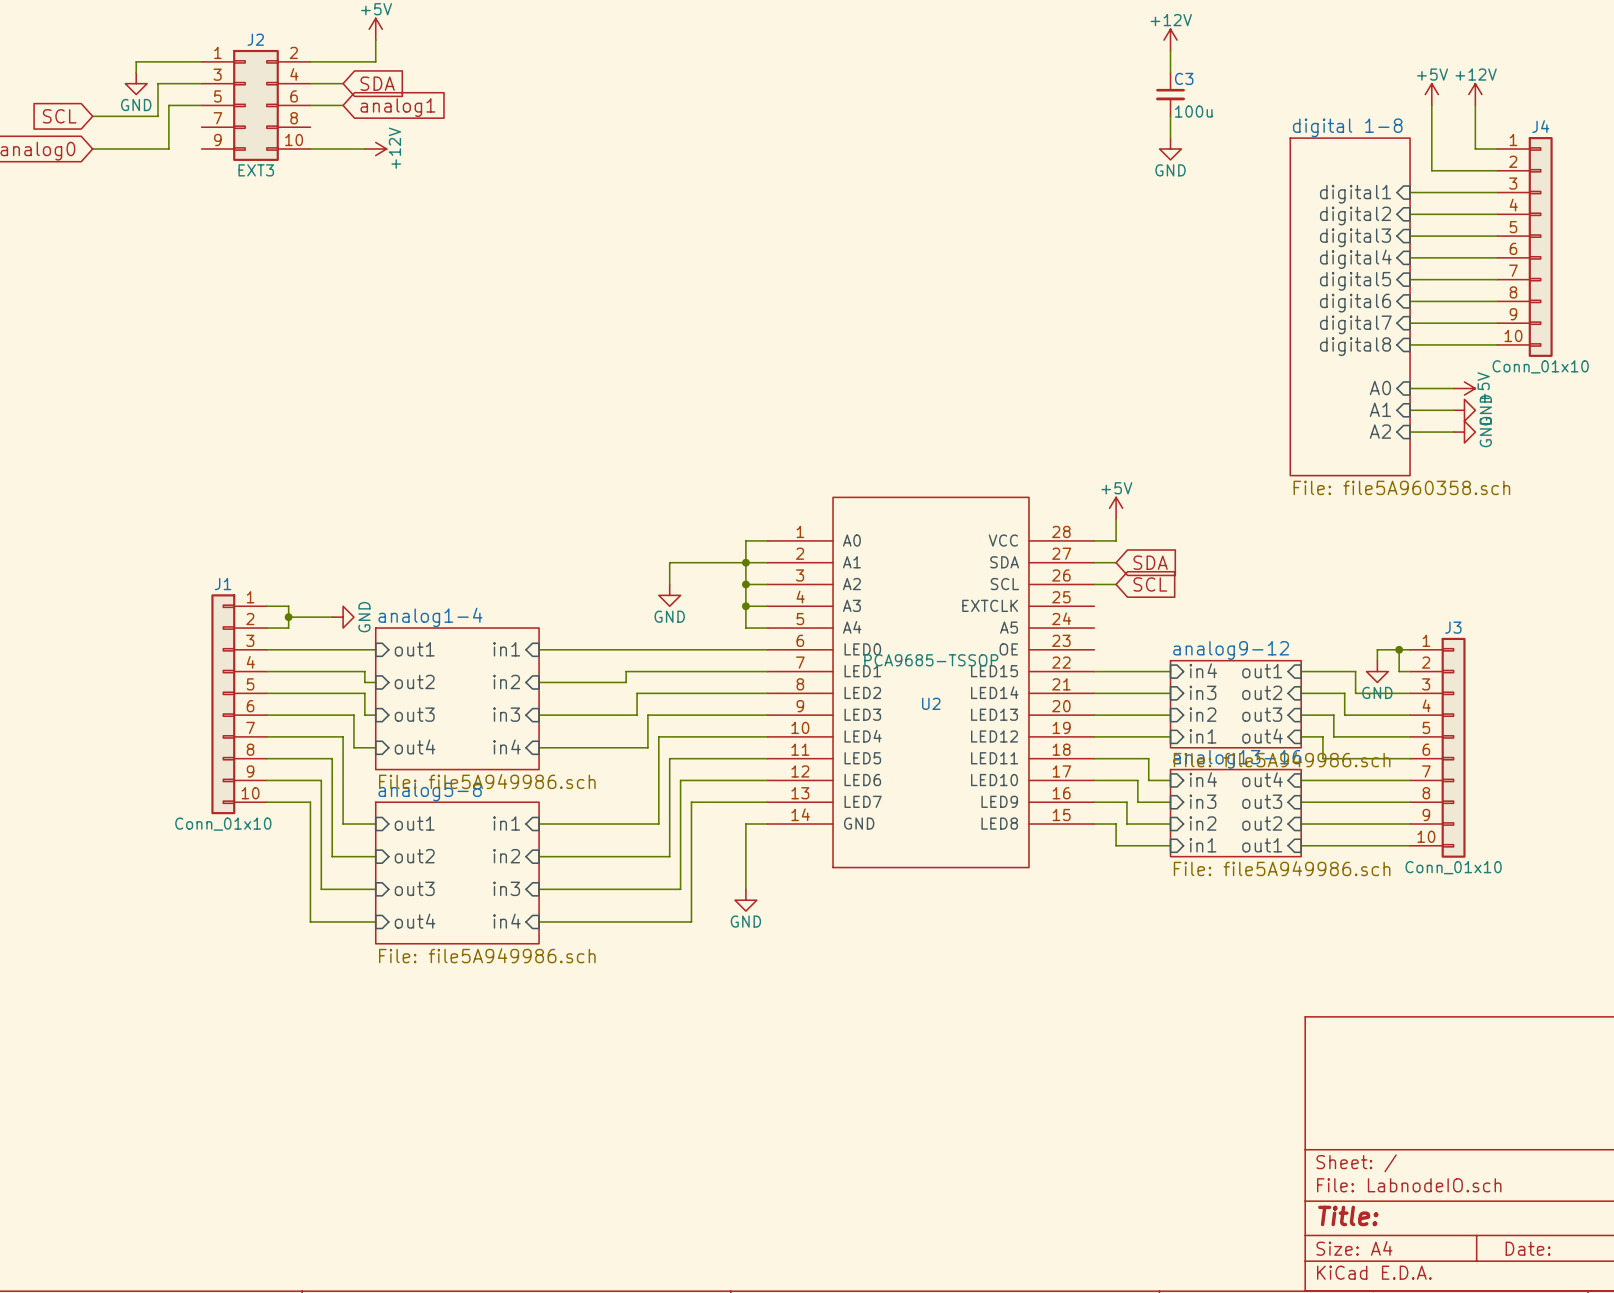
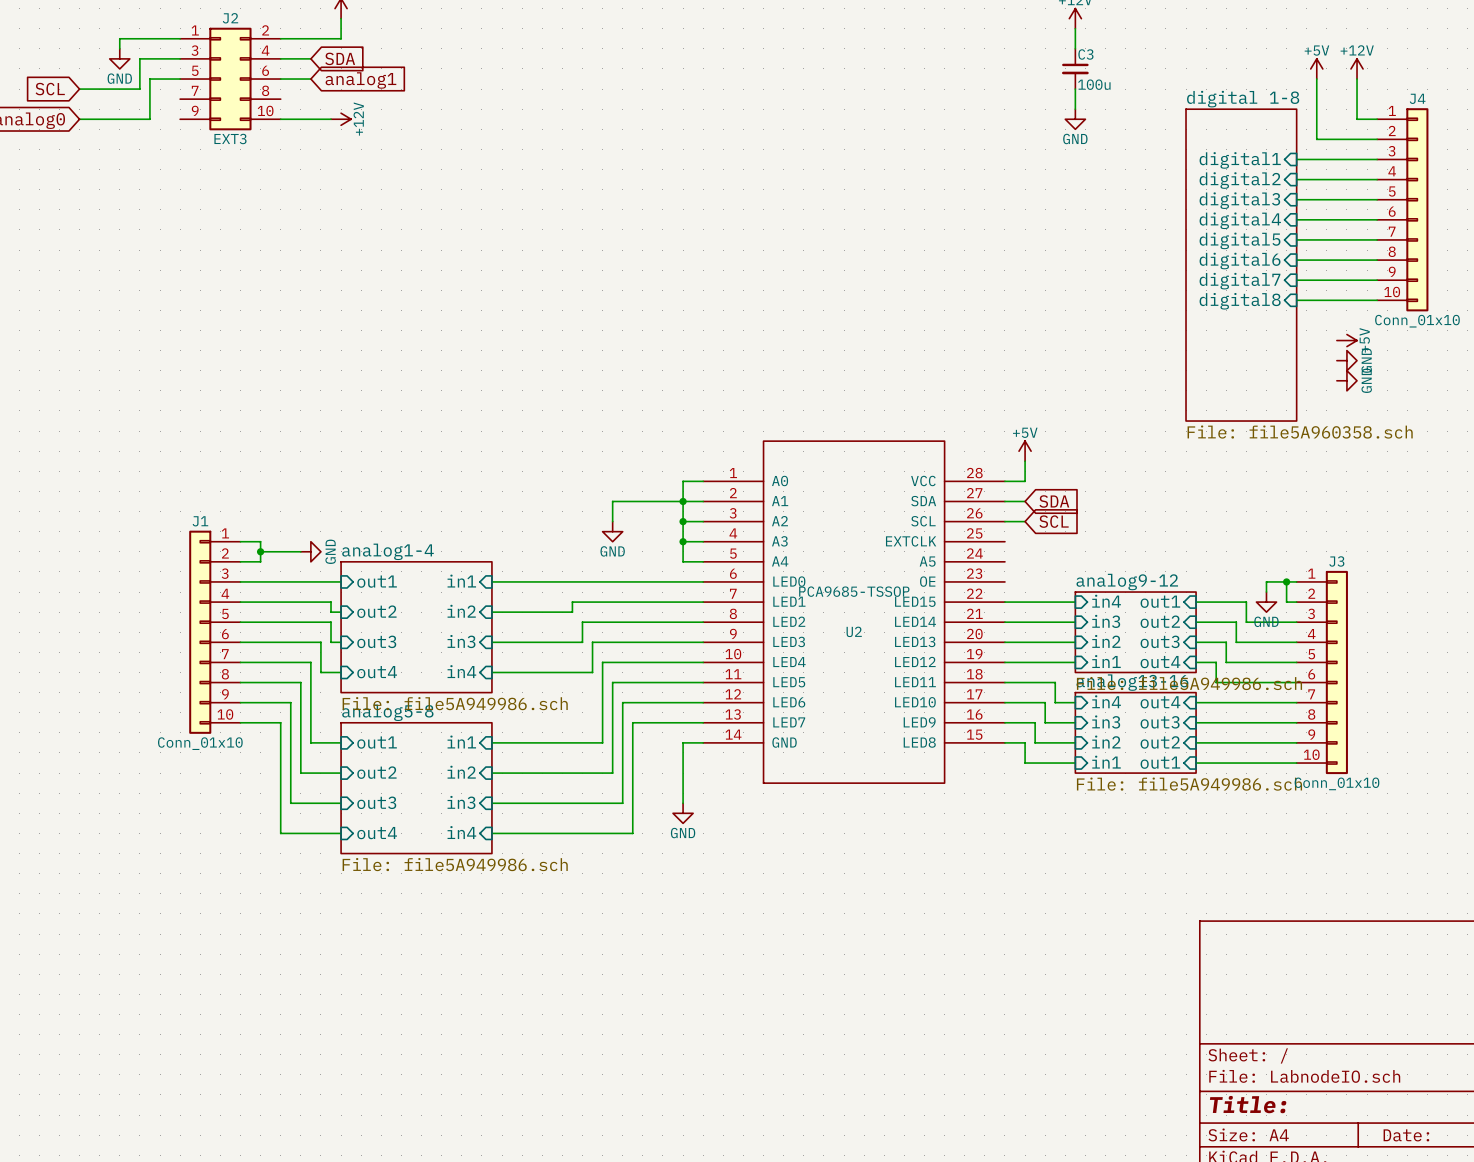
sheet pin: A0 (1380, 388) -> none
wire: (1410, 388) (1453, 388) -> none
sheet pin: A1 (1380, 409) -> none
wire: (1410, 410) (1453, 410) -> none
sheet pin: A2 (1380, 431) -> none
wire: (1410, 432) (1453, 432) -> none

